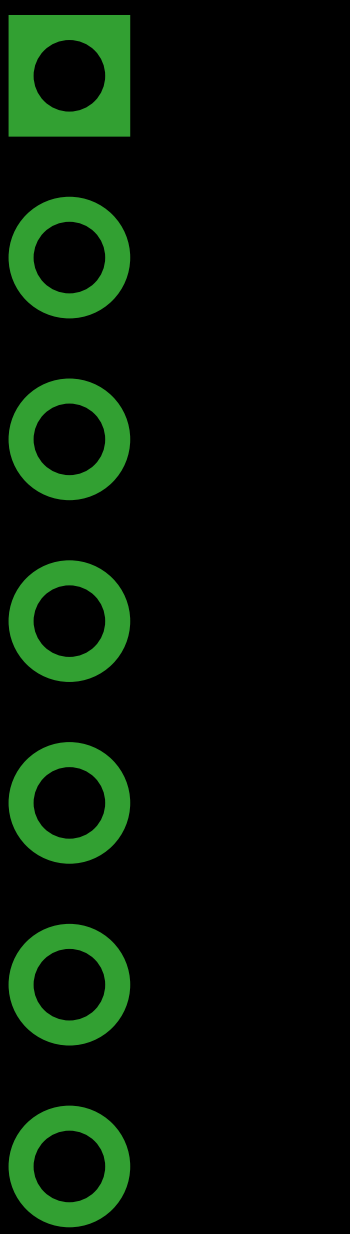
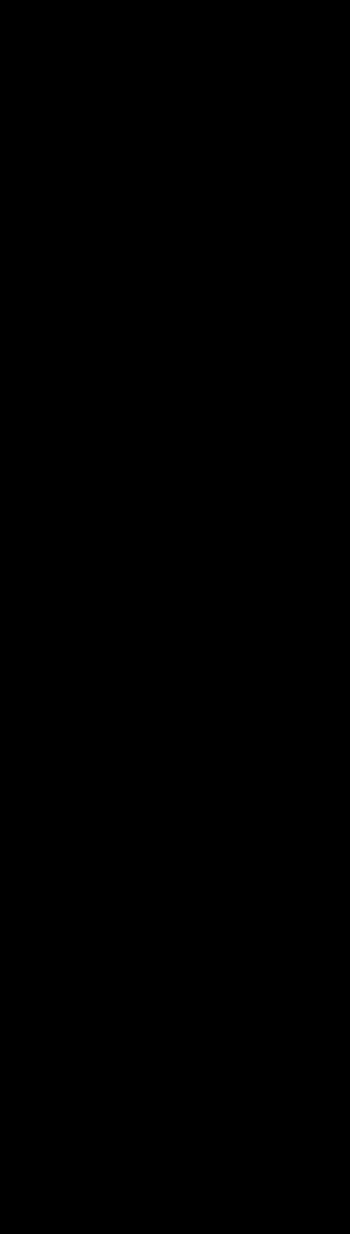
part: (69, 621) -> none

